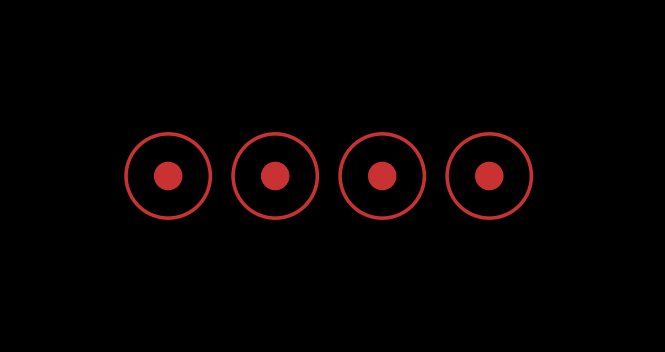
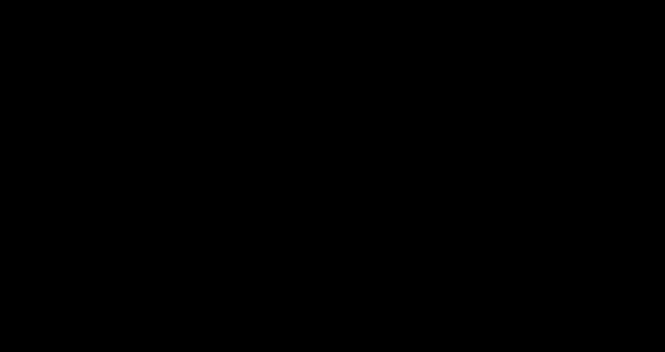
part: (168, 175) -> none
part: (275, 175) -> none
part: (382, 175) -> none
part: (489, 175) -> none

